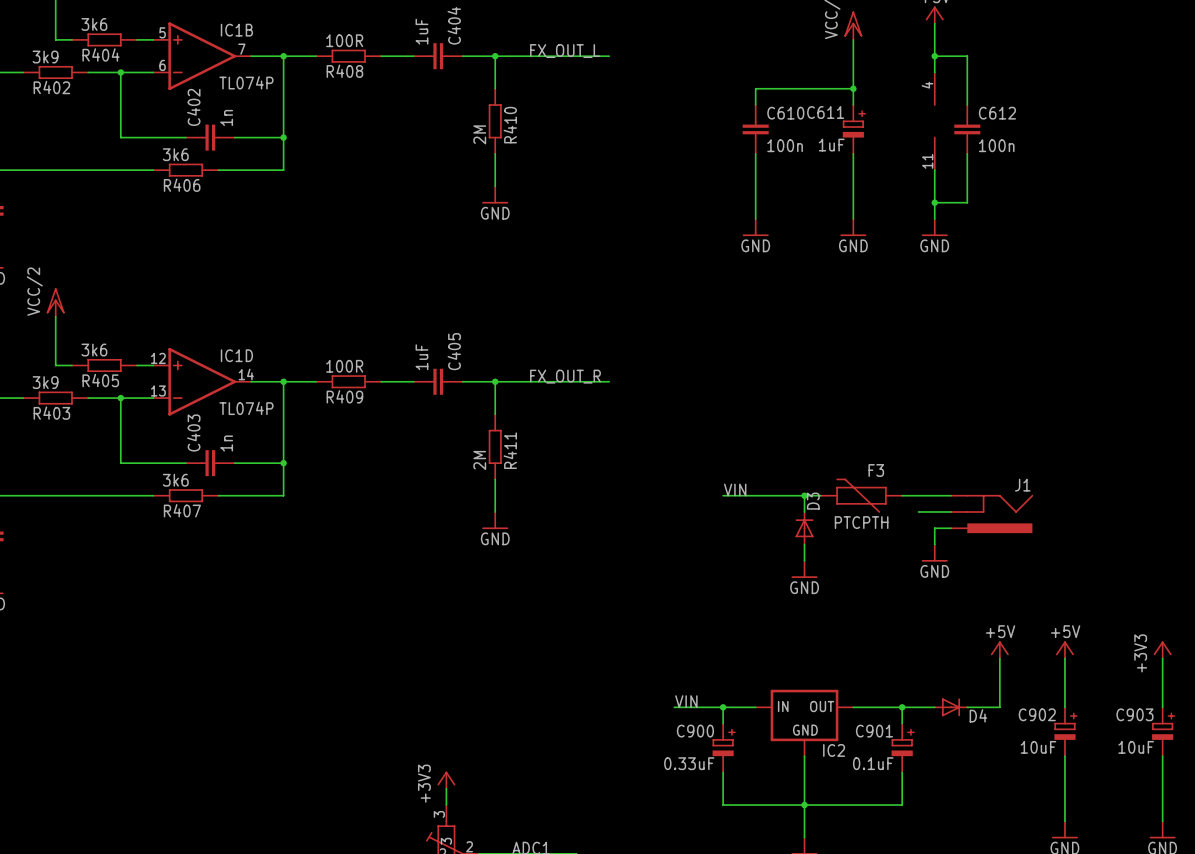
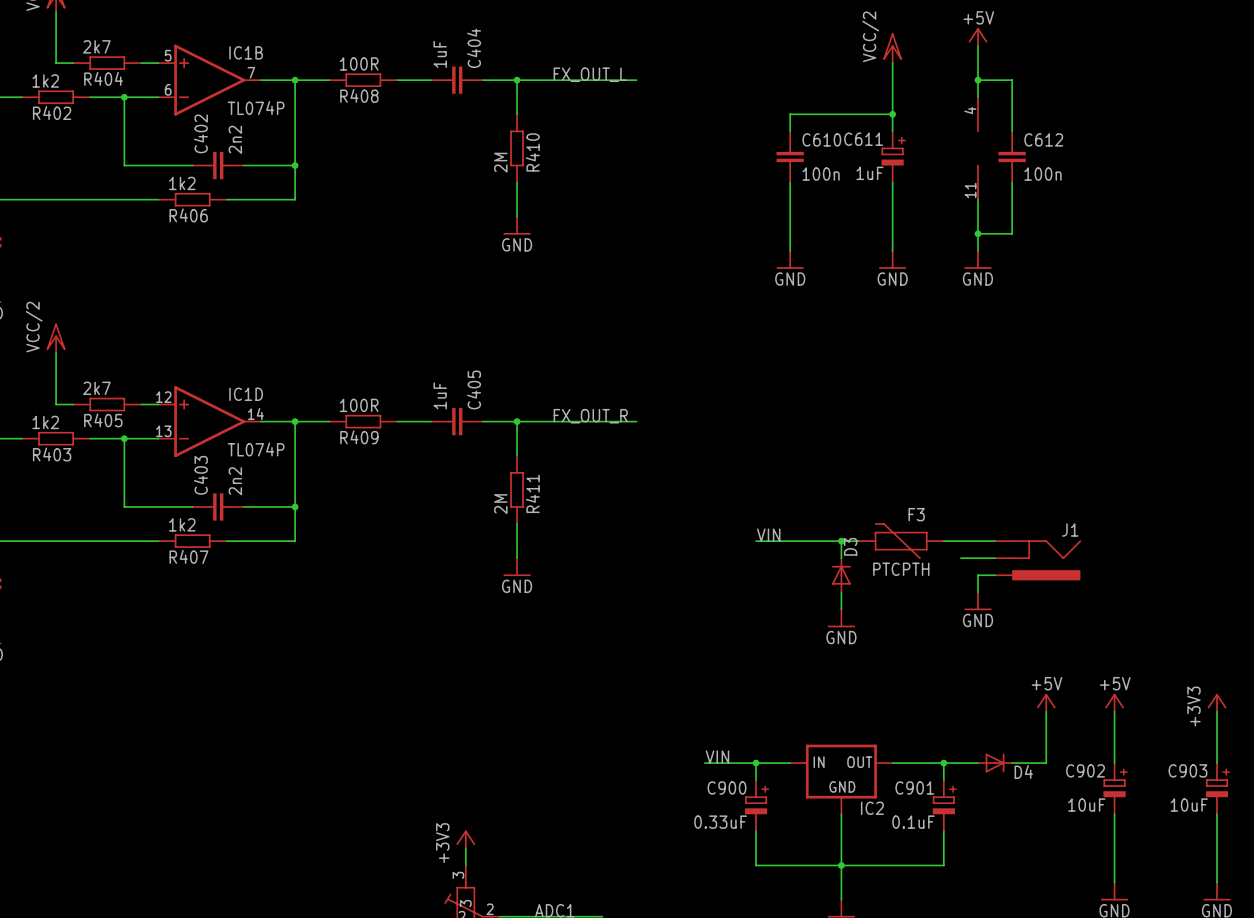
R404 value: 3k6 (94, 24) -> 2k7 (96, 46)
R402 value: 3k9 (45, 57) -> 1k2 (45, 81)
C402 value: 1n (226, 117) -> 2n2 (235, 139)
R406 value: 3k6 (175, 154) -> 1k2 (182, 183)
R405 value: 3k6 (94, 350) -> 2k7 (96, 388)
R403 value: 3k9 (45, 382) -> 1k2 (45, 422)
C403 value: 1n (226, 443) -> 2n2 (235, 481)
R407 value: 3k6 (175, 480) -> 1k2 (182, 524)

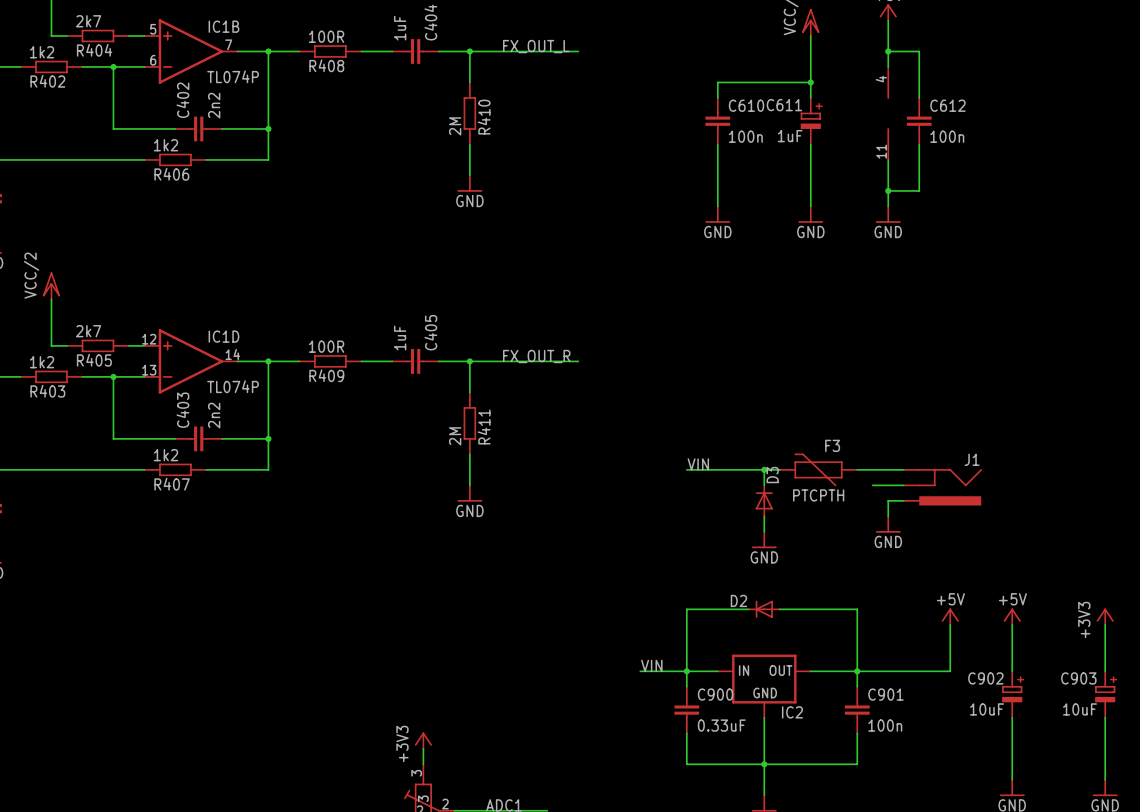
wire: none -> (748, 609) (686, 609) (686, 671)
D2: none -> (764, 609)
wire: none -> (779, 609) (857, 609) (857, 671)
D4: (995, 763) -> none
C900 symbol: [744, 780, 768, 832] -> [674, 686, 700, 734]
C901 symbol: [932, 780, 955, 832] -> [844, 686, 870, 734]
C900 name position: C900 (726, 787) -> C900 (715, 694)
C901 name position: C901 (914, 787) -> C901 (885, 694)
C900 value position: 0.33uF (720, 822) -> 0.33uF (721, 725)
C901 value: 0.1uF (913, 822) -> 100n (885, 725)

